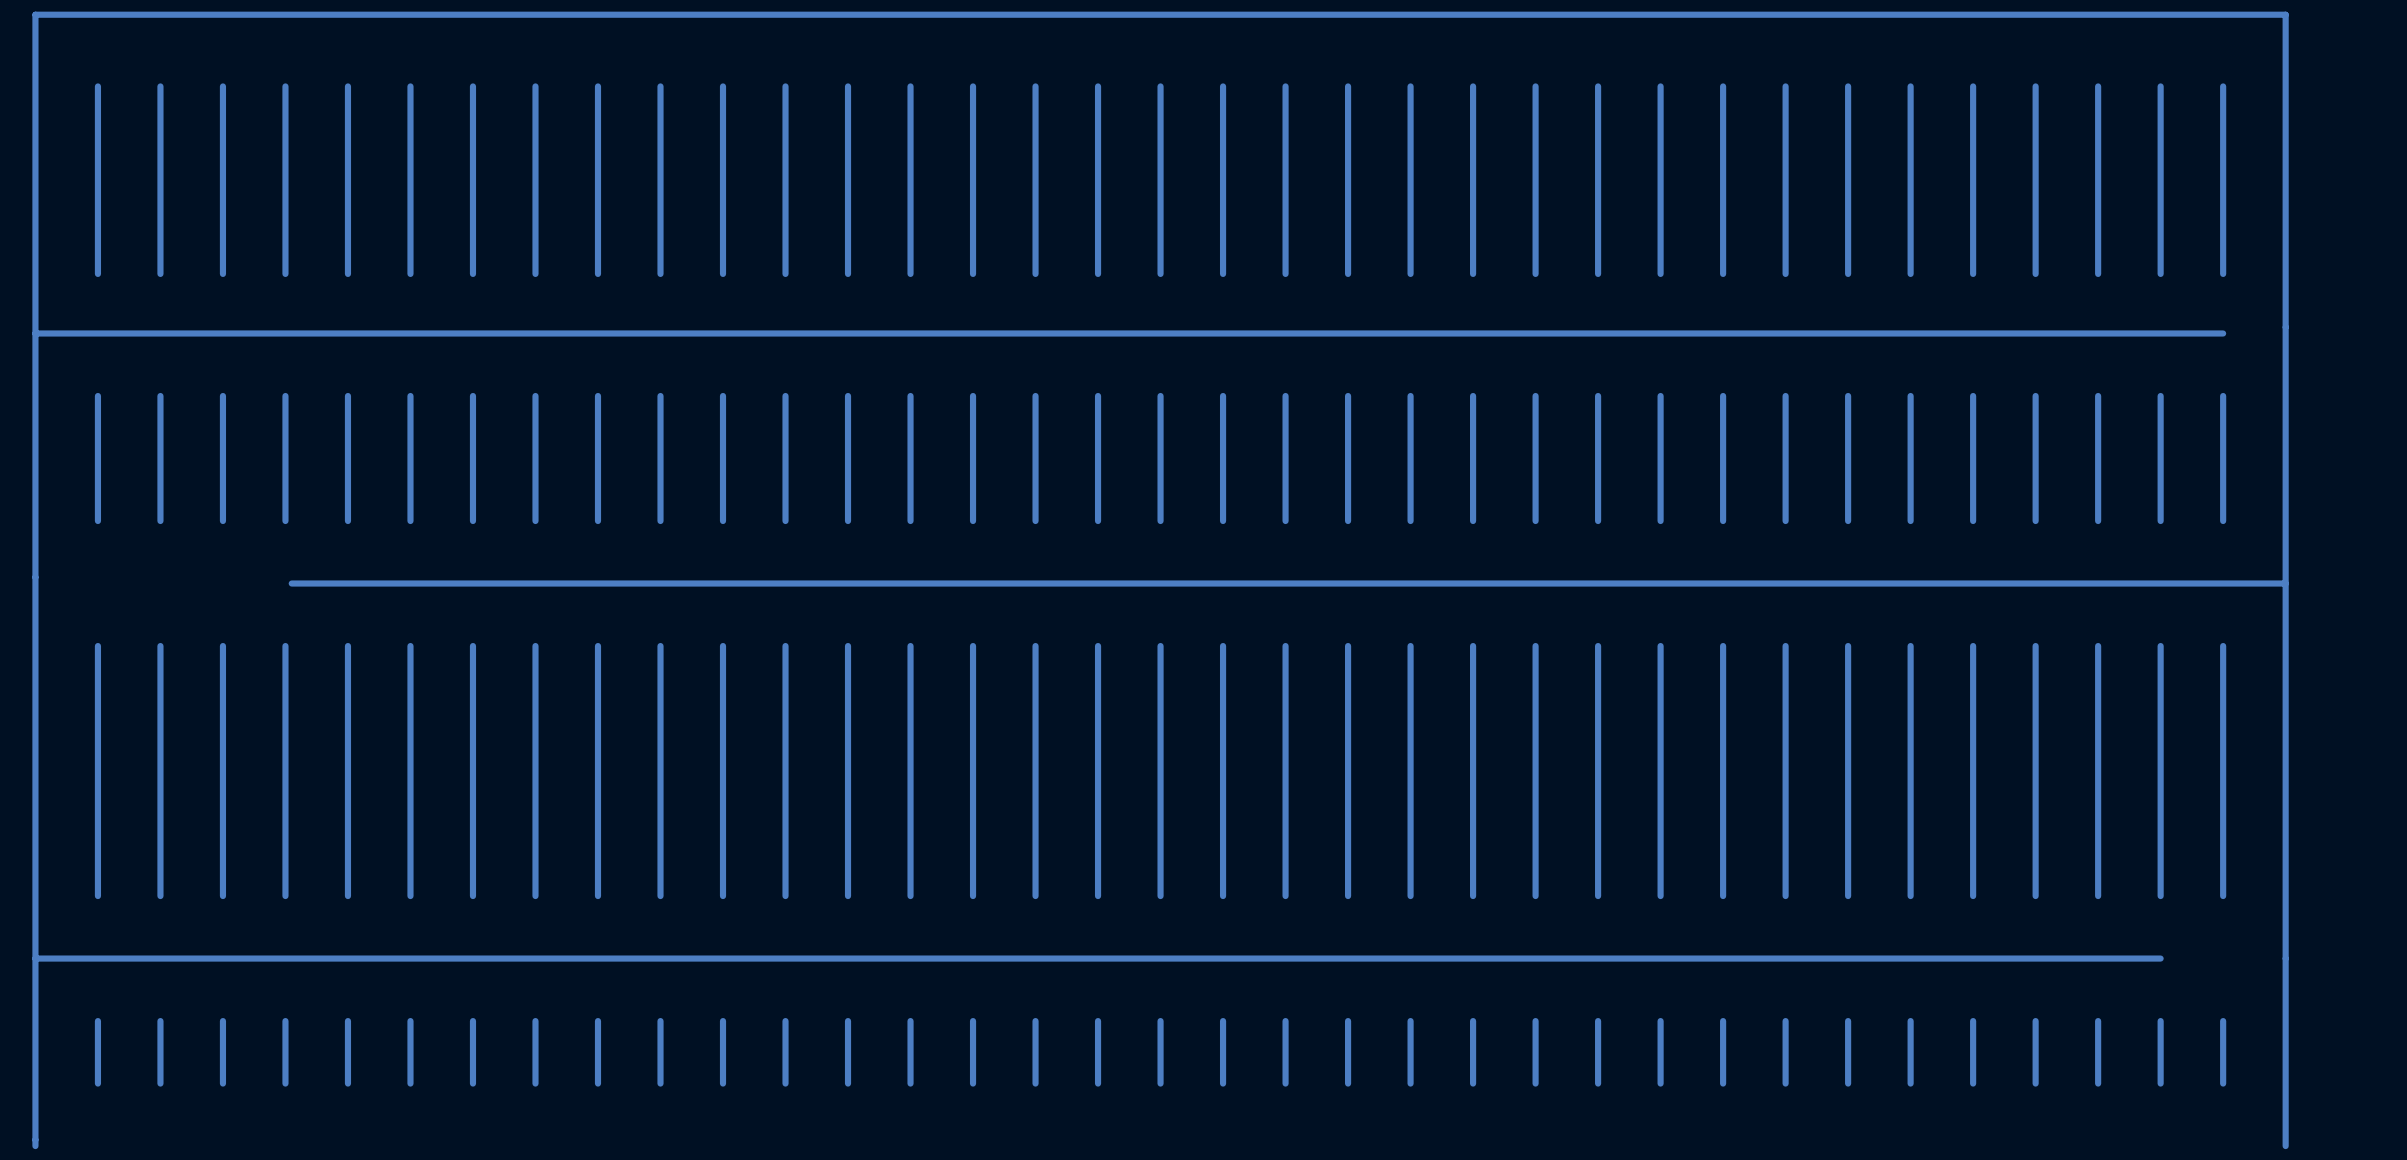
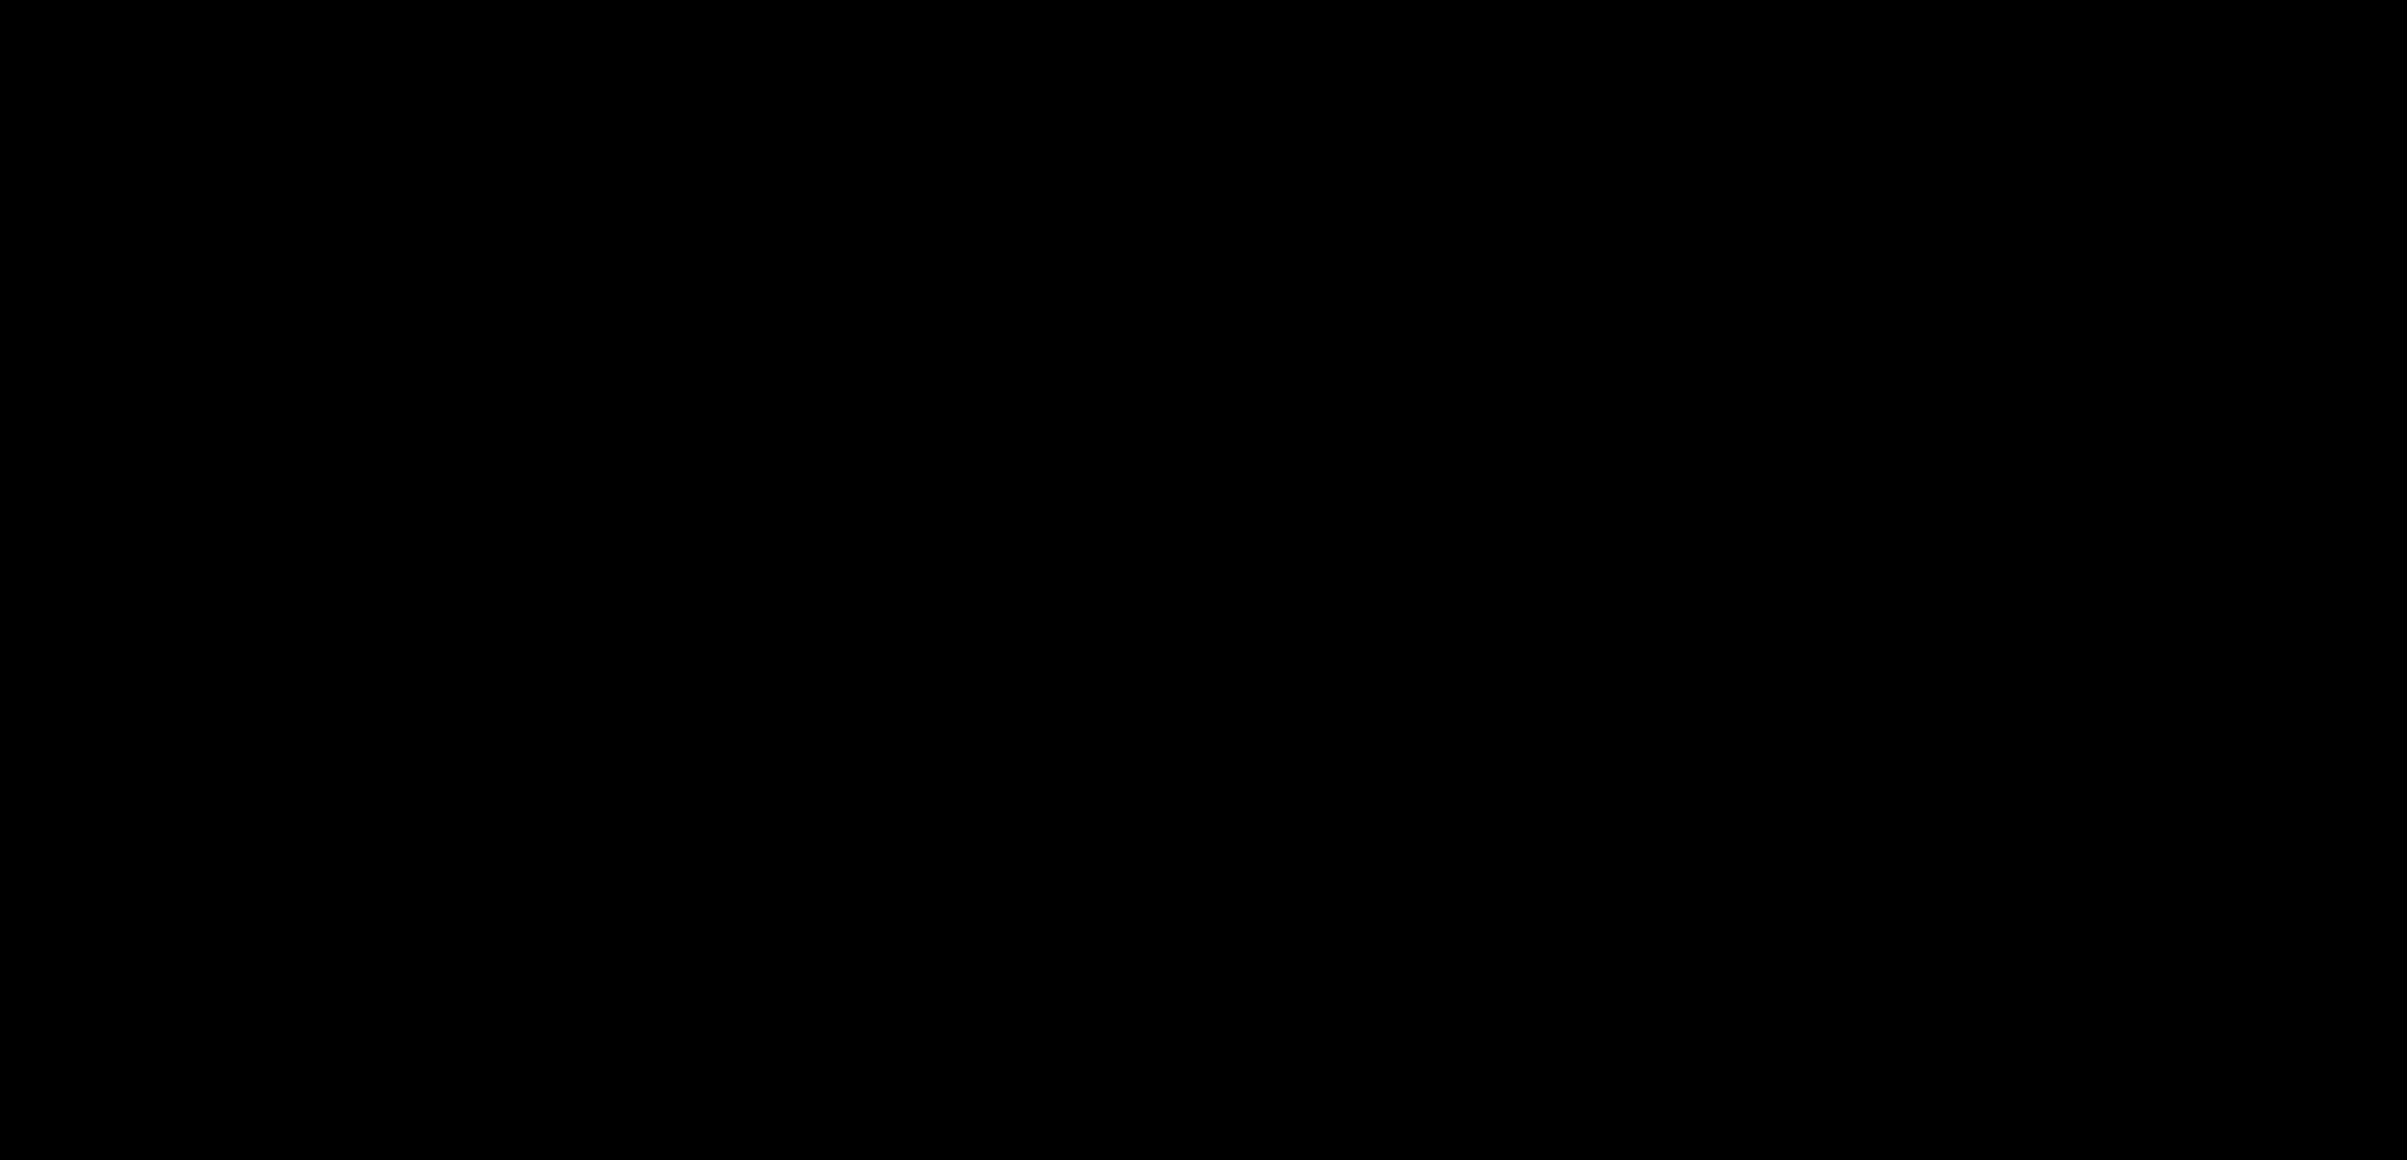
track: (97, 86) (97, 273) -> none
track: (160, 86) (160, 273) -> none
track: (222, 86) (222, 273) -> none
track: (285, 86) (285, 273) -> none
track: (347, 86) (347, 273) -> none
track: (410, 86) (410, 273) -> none
track: (472, 86) (472, 273) -> none
track: (535, 86) (535, 273) -> none
track: (597, 86) (597, 273) -> none
track: (660, 86) (660, 273) -> none
track: (723, 86) (723, 273) -> none
track: (785, 86) (785, 273) -> none
track: (848, 86) (848, 273) -> none
track: (910, 86) (910, 273) -> none
track: (973, 86) (973, 273) -> none
track: (1035, 86) (1035, 273) -> none
track: (1098, 86) (1098, 273) -> none
track: (1160, 86) (1160, 273) -> none
track: (1223, 86) (1223, 273) -> none
track: (1285, 86) (1285, 273) -> none
track: (1348, 86) (1348, 273) -> none
track: (1410, 86) (1410, 273) -> none
track: (1473, 86) (1473, 273) -> none
track: (1535, 86) (1535, 273) -> none
track: (1598, 86) (1598, 273) -> none
track: (1660, 86) (1660, 273) -> none
track: (1723, 86) (1723, 273) -> none
track: (1785, 86) (1785, 273) -> none
track: (1848, 86) (1848, 273) -> none
track: (1910, 86) (1910, 273) -> none
track: (1973, 86) (1973, 273) -> none
track: (2035, 86) (2035, 273) -> none
track: (2098, 86) (2098, 273) -> none
track: (2160, 86) (2160, 273) -> none
track: (2223, 86) (2223, 273) -> none
track: (2223, 333) (35, 333) -> none
track: (97, 396) (97, 521) -> none
track: (160, 396) (160, 521) -> none
track: (222, 396) (222, 521) -> none
track: (285, 396) (285, 521) -> none
track: (347, 396) (347, 521) -> none
track: (410, 396) (410, 521) -> none
track: (472, 396) (472, 521) -> none
track: (535, 396) (535, 521) -> none
track: (597, 396) (597, 521) -> none
track: (660, 396) (660, 521) -> none
track: (723, 396) (723, 521) -> none
track: (785, 396) (785, 521) -> none
track: (848, 396) (848, 521) -> none
track: (910, 396) (910, 521) -> none
track: (973, 396) (973, 521) -> none
track: (1035, 396) (1035, 521) -> none
track: (1098, 396) (1098, 521) -> none
track: (1160, 396) (1160, 521) -> none
track: (1223, 396) (1223, 521) -> none
track: (1285, 396) (1285, 521) -> none
track: (1348, 396) (1348, 521) -> none
track: (1410, 396) (1410, 521) -> none
track: (1473, 396) (1473, 521) -> none
track: (1535, 396) (1535, 521) -> none
track: (1598, 396) (1598, 521) -> none
track: (1660, 396) (1660, 521) -> none
track: (1723, 396) (1723, 521) -> none
track: (1785, 396) (1785, 521) -> none
track: (1848, 396) (1848, 521) -> none
track: (1910, 396) (1910, 521) -> none
track: (1973, 396) (1973, 521) -> none
track: (2035, 396) (2035, 521) -> none
track: (2098, 396) (2098, 521) -> none
track: (2160, 396) (2160, 521) -> none
track: (2223, 396) (2223, 521) -> none
track: (2285, 583) (291, 583) -> none
track: (97, 646) (97, 896) -> none
track: (160, 646) (160, 896) -> none
track: (222, 646) (222, 896) -> none
track: (285, 646) (285, 896) -> none
track: (347, 646) (347, 896) -> none
track: (410, 646) (410, 896) -> none
track: (472, 646) (472, 896) -> none
track: (535, 646) (535, 896) -> none
track: (597, 646) (597, 896) -> none
track: (660, 646) (660, 896) -> none
track: (723, 646) (723, 896) -> none
track: (785, 646) (785, 896) -> none
track: (848, 646) (848, 896) -> none
track: (910, 646) (910, 896) -> none
track: (973, 646) (973, 896) -> none
track: (1035, 646) (1035, 896) -> none
track: (1098, 646) (1098, 896) -> none
track: (1160, 646) (1160, 896) -> none
track: (1223, 646) (1223, 896) -> none
track: (1285, 646) (1285, 896) -> none
track: (1348, 646) (1348, 896) -> none
track: (1410, 646) (1410, 896) -> none
track: (1473, 646) (1473, 896) -> none
track: (1535, 646) (1535, 896) -> none
track: (1598, 646) (1598, 896) -> none
track: (1660, 646) (1660, 896) -> none
track: (1723, 646) (1723, 896) -> none
track: (1785, 646) (1785, 896) -> none
track: (1848, 646) (1848, 896) -> none
track: (1910, 646) (1910, 896) -> none
track: (1973, 646) (1973, 896) -> none
track: (2035, 646) (2035, 896) -> none
track: (2098, 646) (2098, 896) -> none
track: (2160, 646) (2160, 896) -> none
track: (2223, 646) (2223, 896) -> none
track: (2160, 958) (35, 958) -> none
track: (97, 1021) (97, 1083) -> none
track: (160, 1021) (160, 1083) -> none
track: (222, 1021) (222, 1083) -> none
track: (285, 1021) (285, 1083) -> none
track: (347, 1021) (347, 1083) -> none
track: (410, 1021) (410, 1083) -> none
track: (472, 1021) (472, 1083) -> none
track: (535, 1021) (535, 1083) -> none
track: (597, 1021) (597, 1083) -> none
track: (660, 1021) (660, 1083) -> none
track: (723, 1021) (723, 1083) -> none
track: (785, 1021) (785, 1083) -> none
track: (848, 1021) (848, 1083) -> none
track: (910, 1021) (910, 1083) -> none
track: (973, 1021) (973, 1083) -> none
track: (1035, 1021) (1035, 1083) -> none
track: (1098, 1021) (1098, 1083) -> none
track: (1160, 1021) (1160, 1083) -> none
track: (1223, 1021) (1223, 1083) -> none
track: (1285, 1021) (1285, 1083) -> none
track: (1348, 1021) (1348, 1083) -> none
track: (1410, 1021) (1410, 1083) -> none
track: (1473, 1021) (1473, 1083) -> none
track: (1535, 1021) (1535, 1083) -> none
track: (1598, 1021) (1598, 1083) -> none
track: (1660, 1021) (1660, 1083) -> none
track: (1723, 1021) (1723, 1083) -> none
track: (1785, 1021) (1785, 1083) -> none
track: (1848, 1021) (1848, 1083) -> none
track: (1910, 1021) (1910, 1083) -> none
track: (1973, 1021) (1973, 1083) -> none
track: (2035, 1021) (2035, 1083) -> none
track: (2098, 1021) (2098, 1083) -> none
track: (2160, 1021) (2160, 1083) -> none
track: (2223, 1021) (2223, 1083) -> none
track: (2285, 1146) (2285, 14) (35, 14) (35, 1146) -> none

